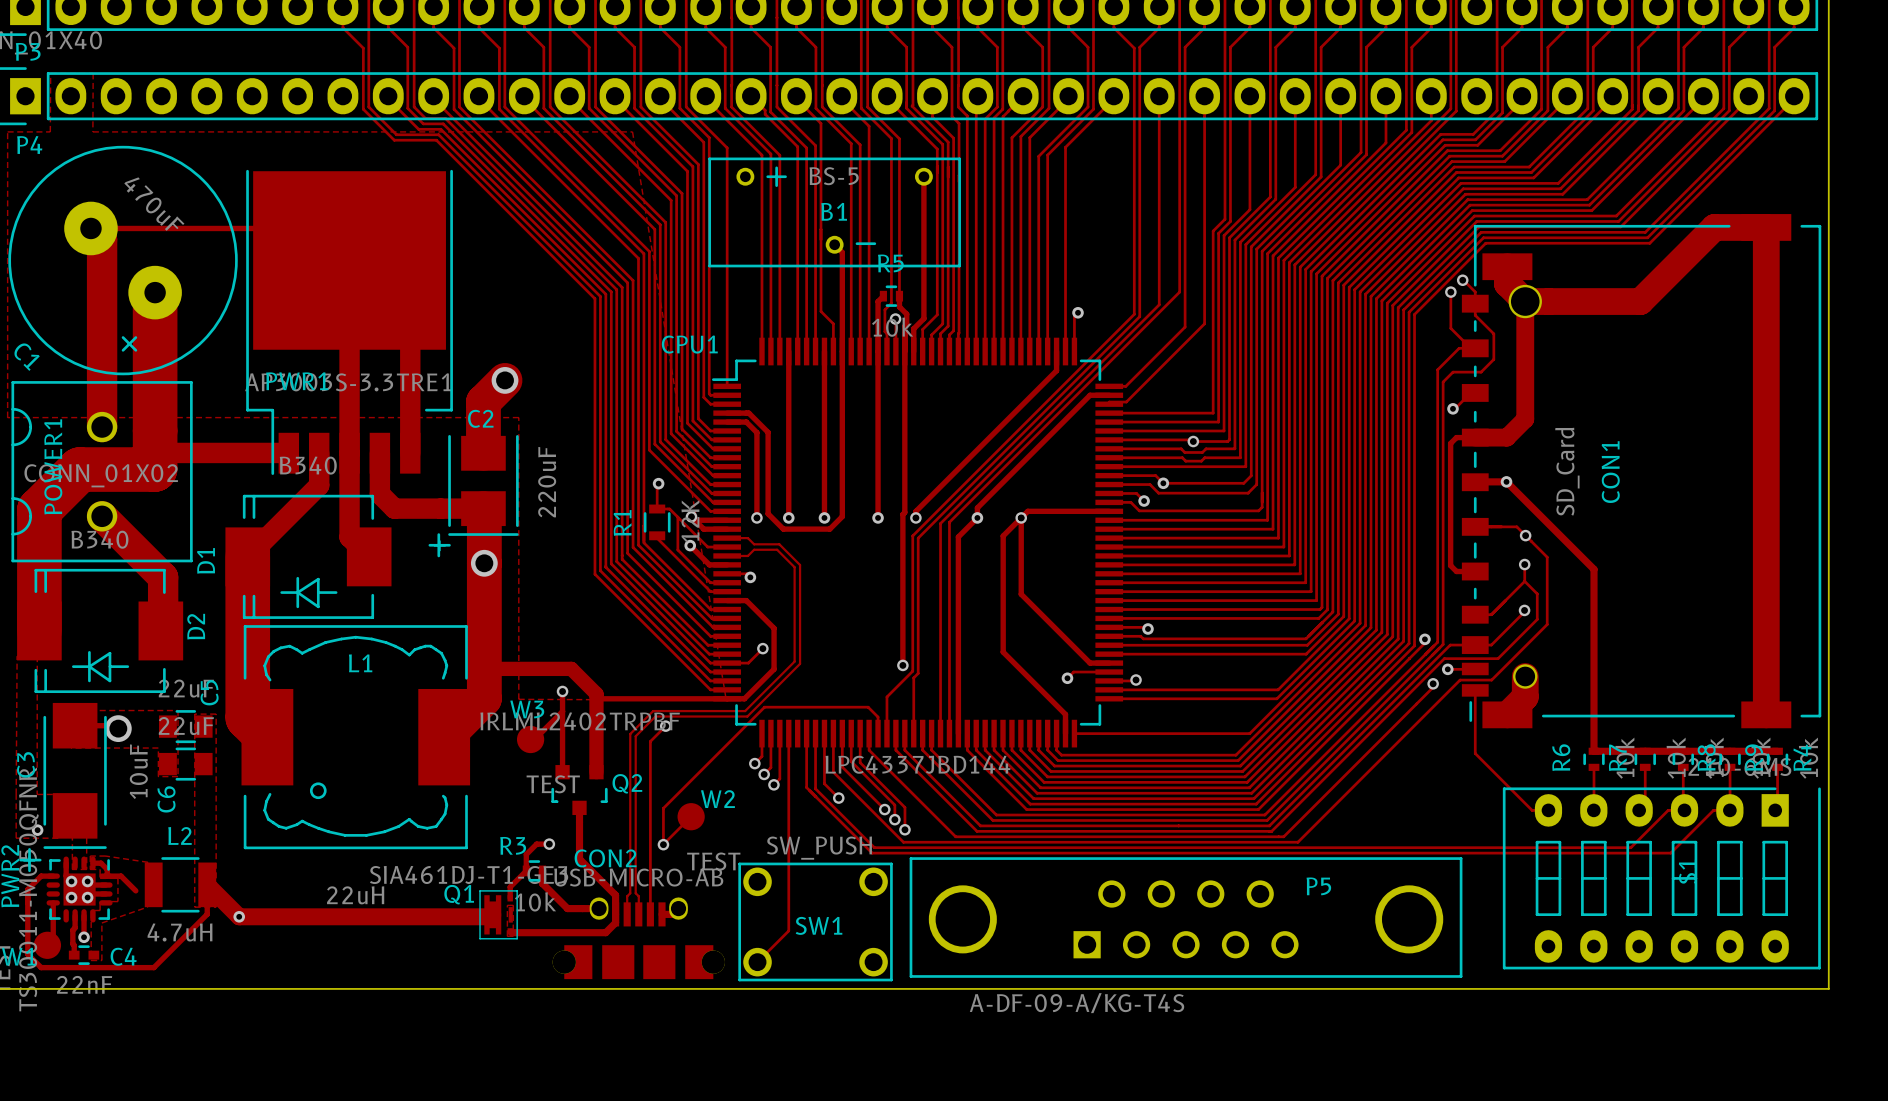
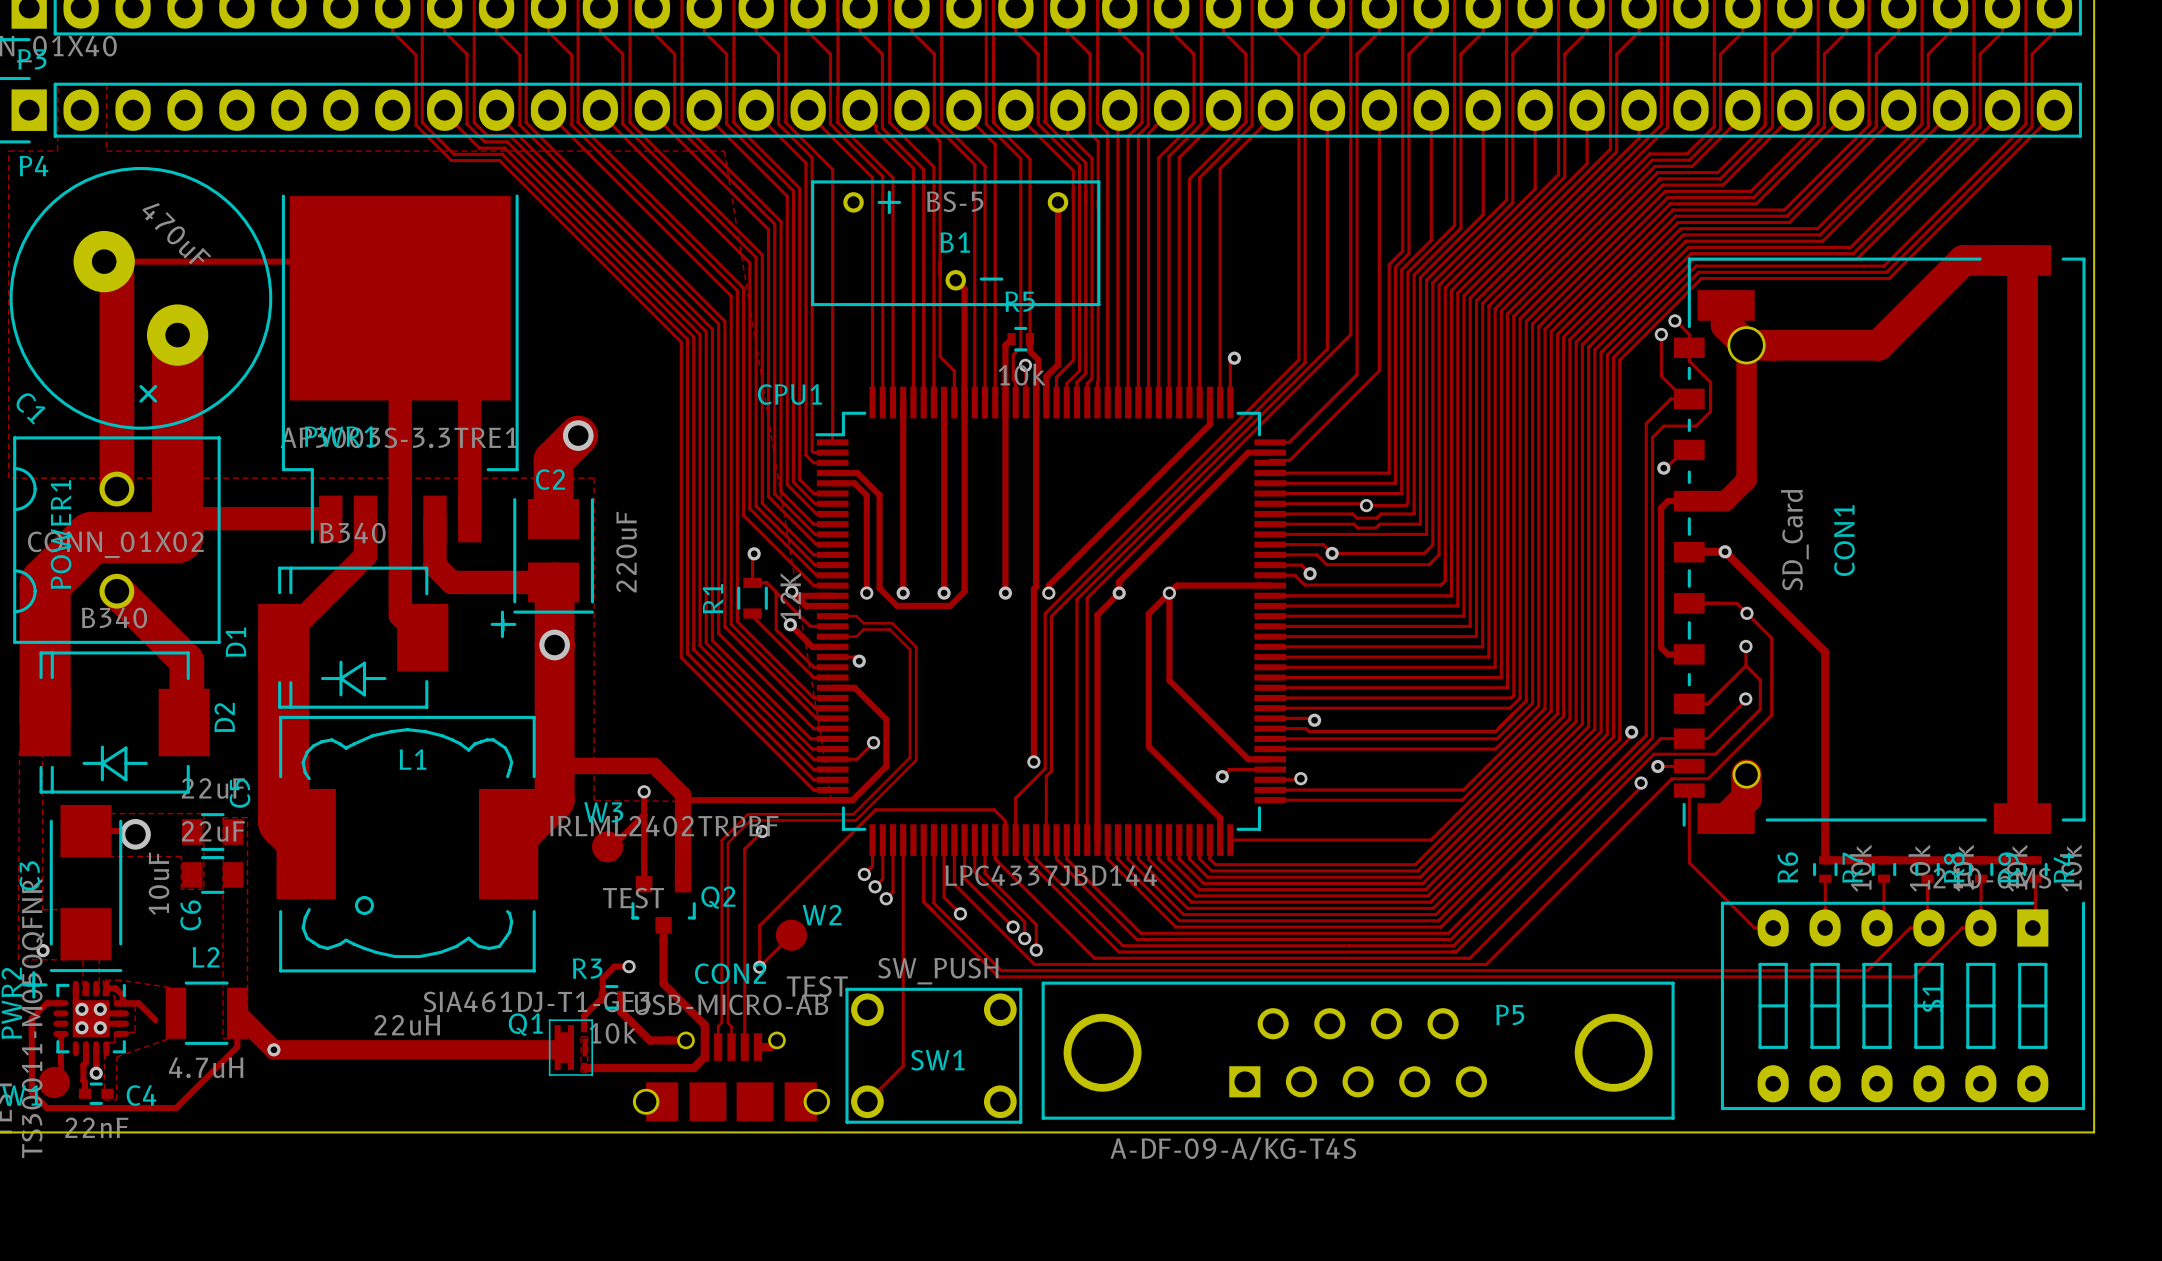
CON2 name position: CON2 (605, 858) -> CON2 (730, 973)
CON2 footprint: [552, 897, 725, 980] -> [632, 1031, 831, 1122]

